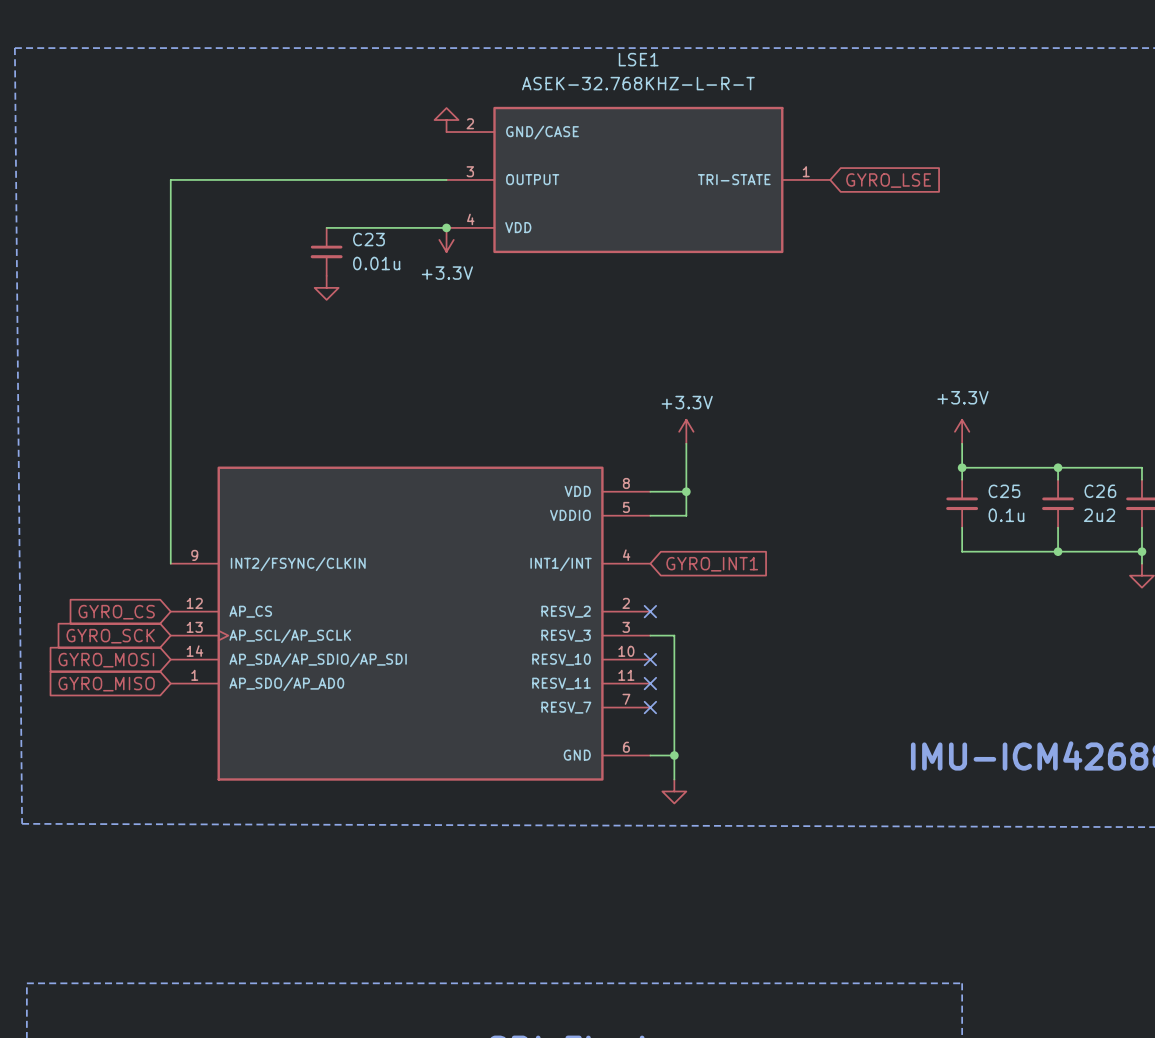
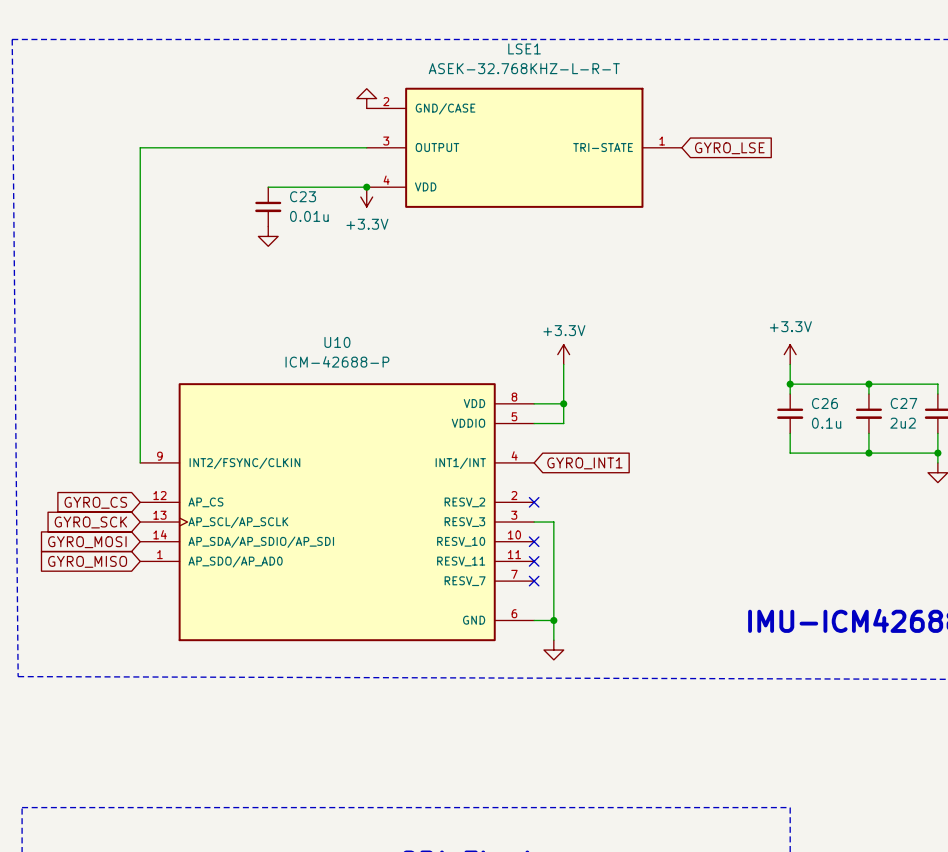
U10 name: none -> U10 (337, 342)
U10 value: none -> ICM-42688-P (337, 361)
C25 name: C25 (1004, 491) -> C26 (824, 403)
C26 name: C26 (1100, 491) -> C27 (903, 403)

